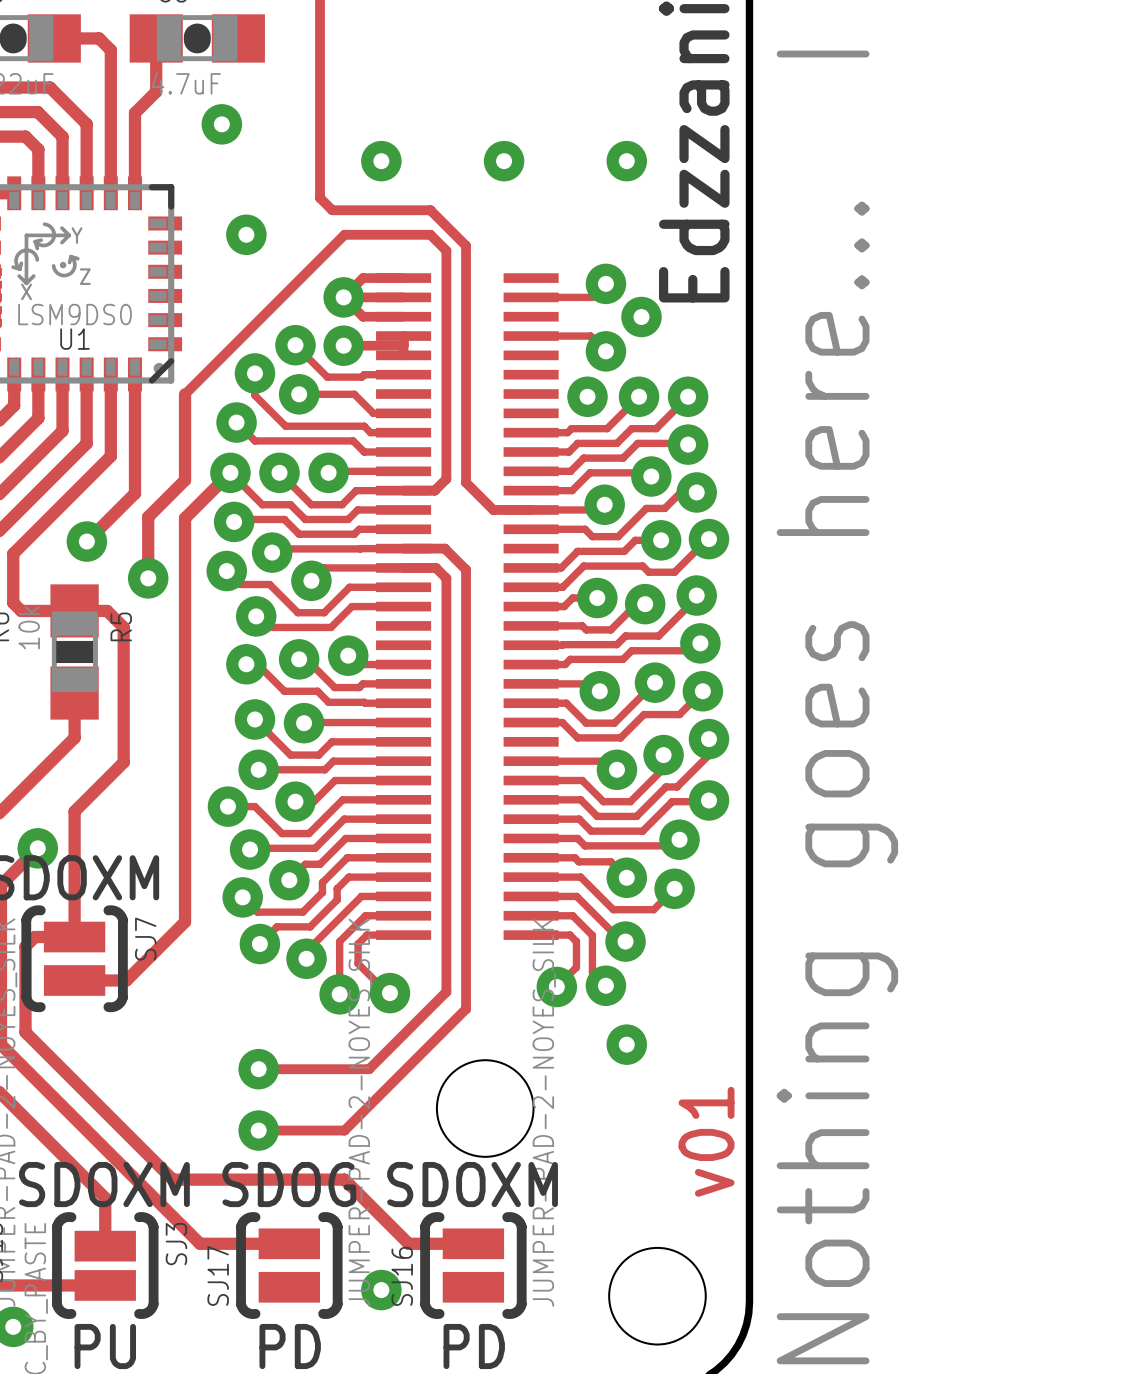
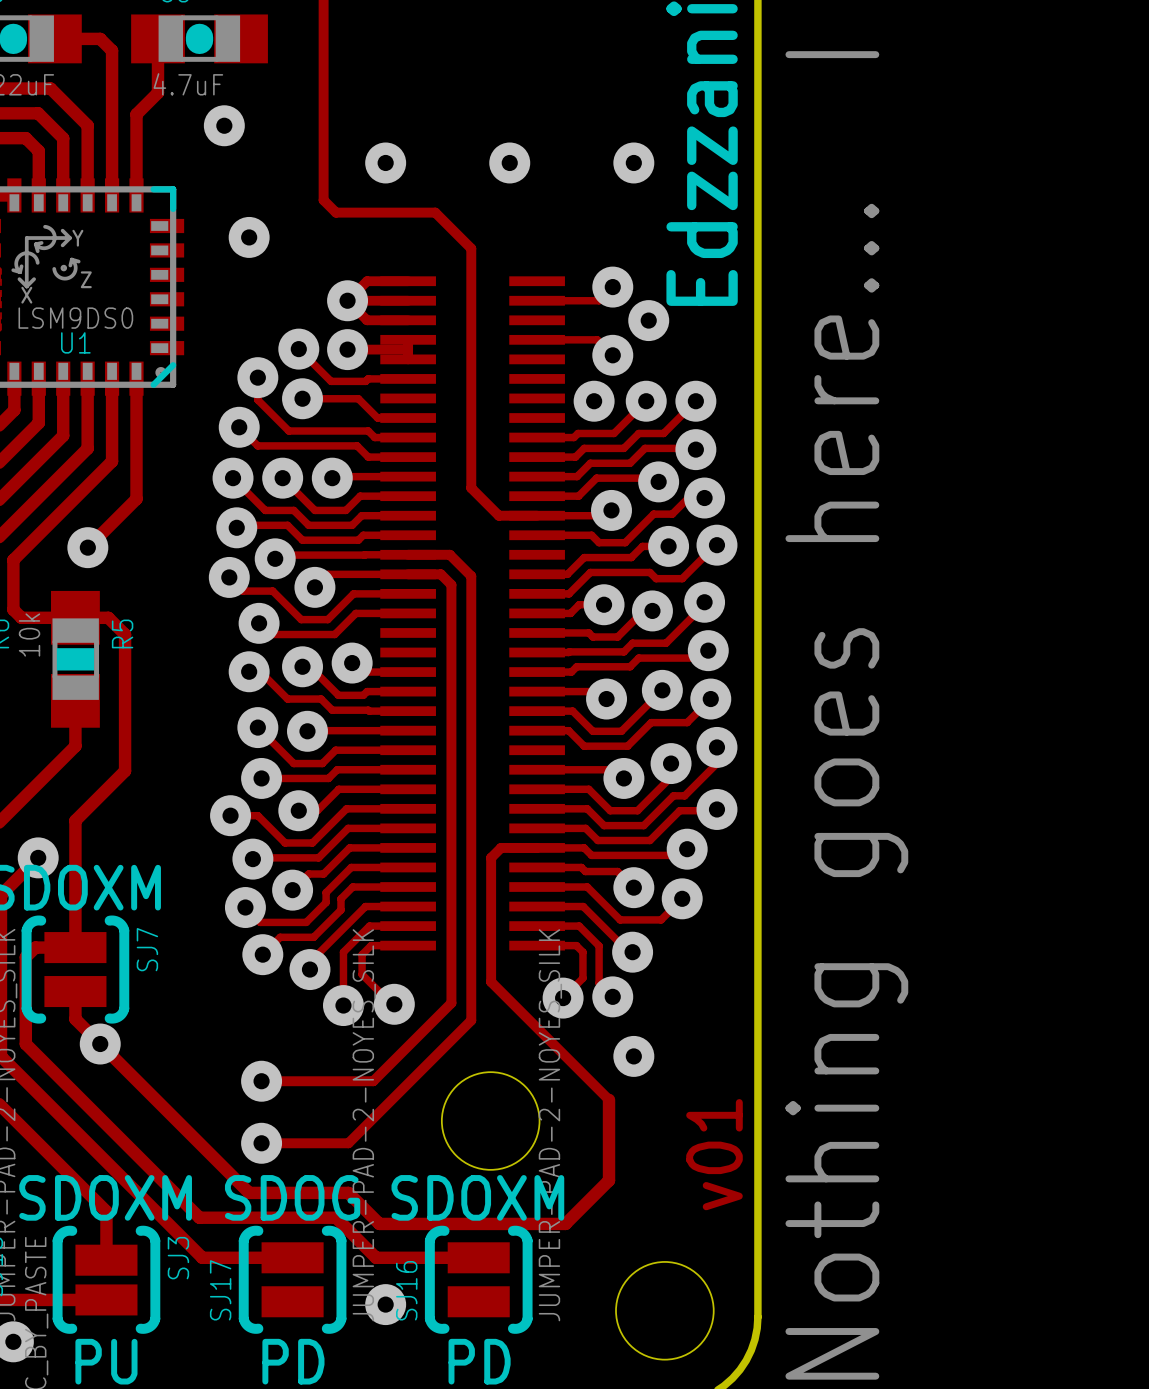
track: (230, 472) (185, 518) (185, 921) (126, 980) (74, 980) -> (249, 1192) (75, 1019) (75, 991)
track: (403, 490) (434, 490) (446, 478) (446, 250) (430, 234) (344, 234) (185, 394) (185, 480) (148, 517) (148, 578) -> none
via: (148, 578) -> none
via: none -> (100, 1044)
track: (172, 1179) (246, 1179) -> (174, 1192) (199, 1217) (336, 1217) (376, 1257) (413, 1257)
track: (375, 1210) (408, 1243) -> (379, 1223) (565, 1223) (609, 1180) (609, 1099) (491, 981) (491, 857) (501, 847) (537, 847)

